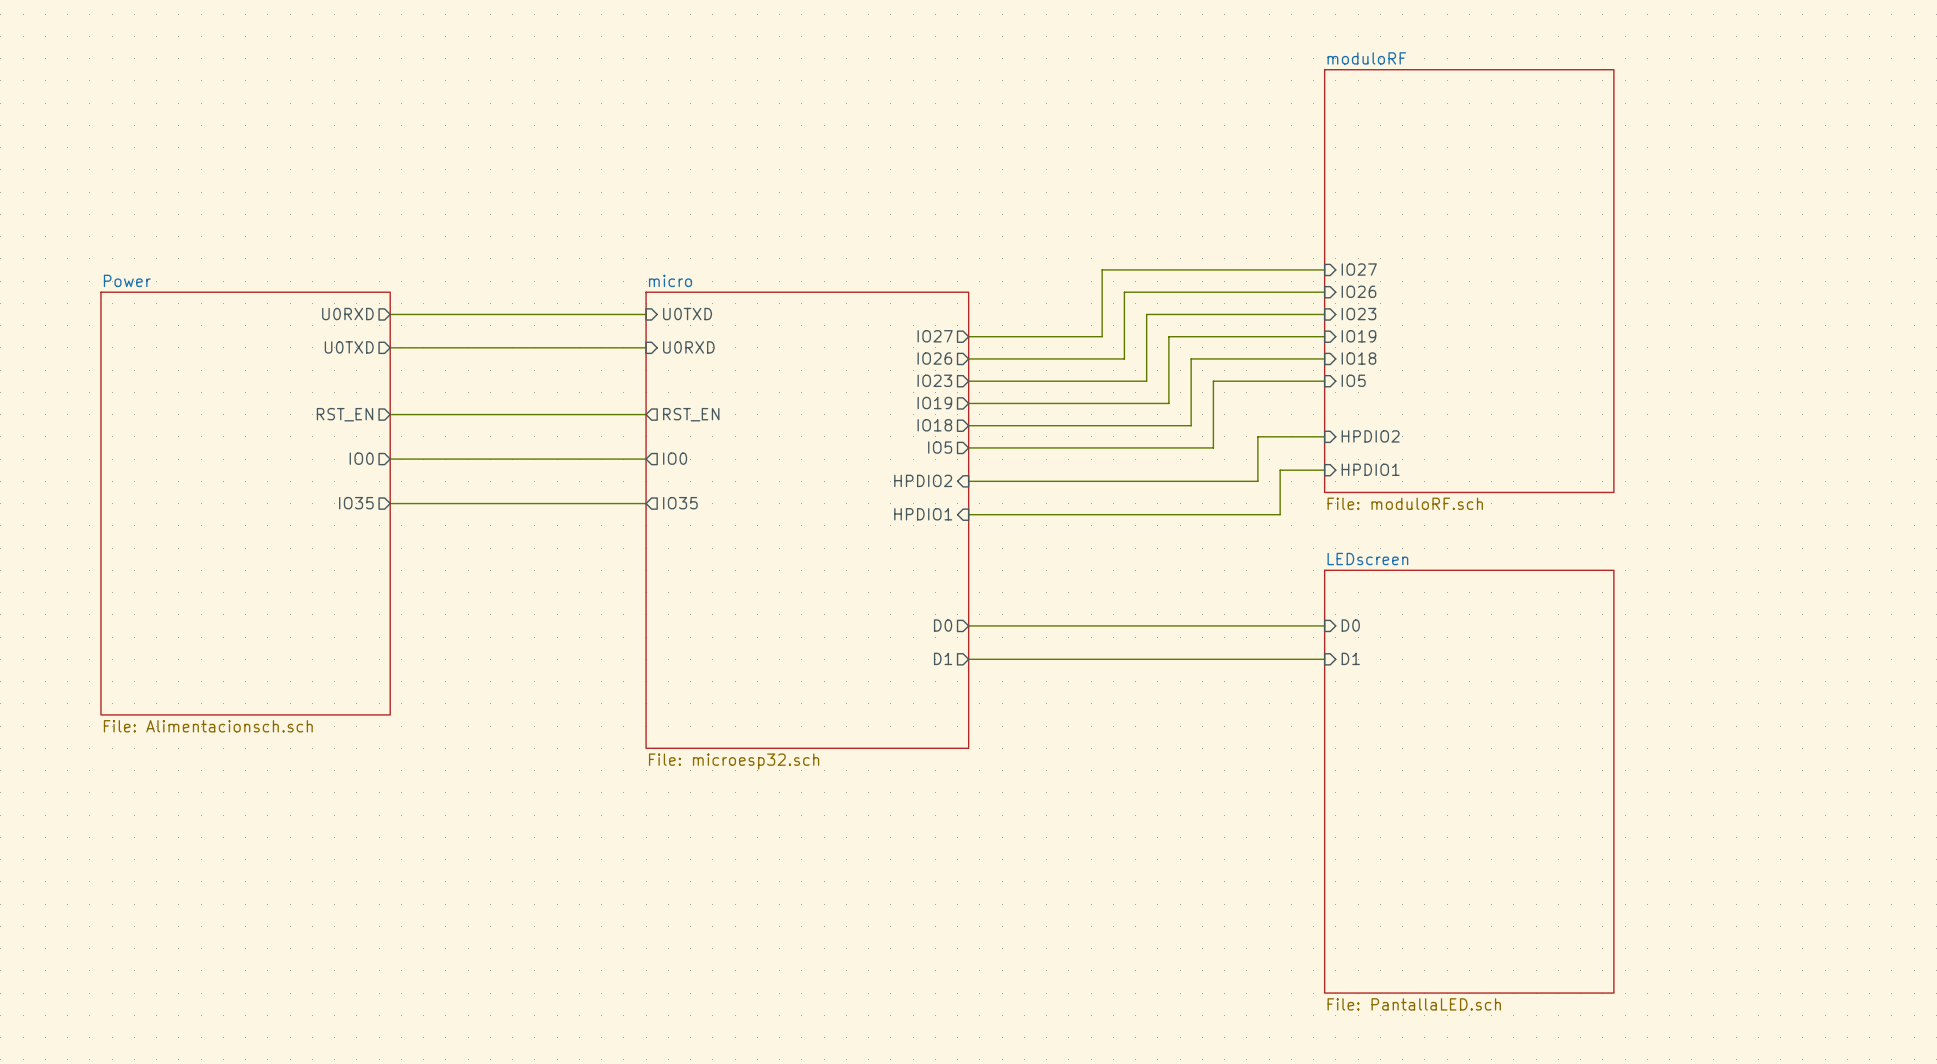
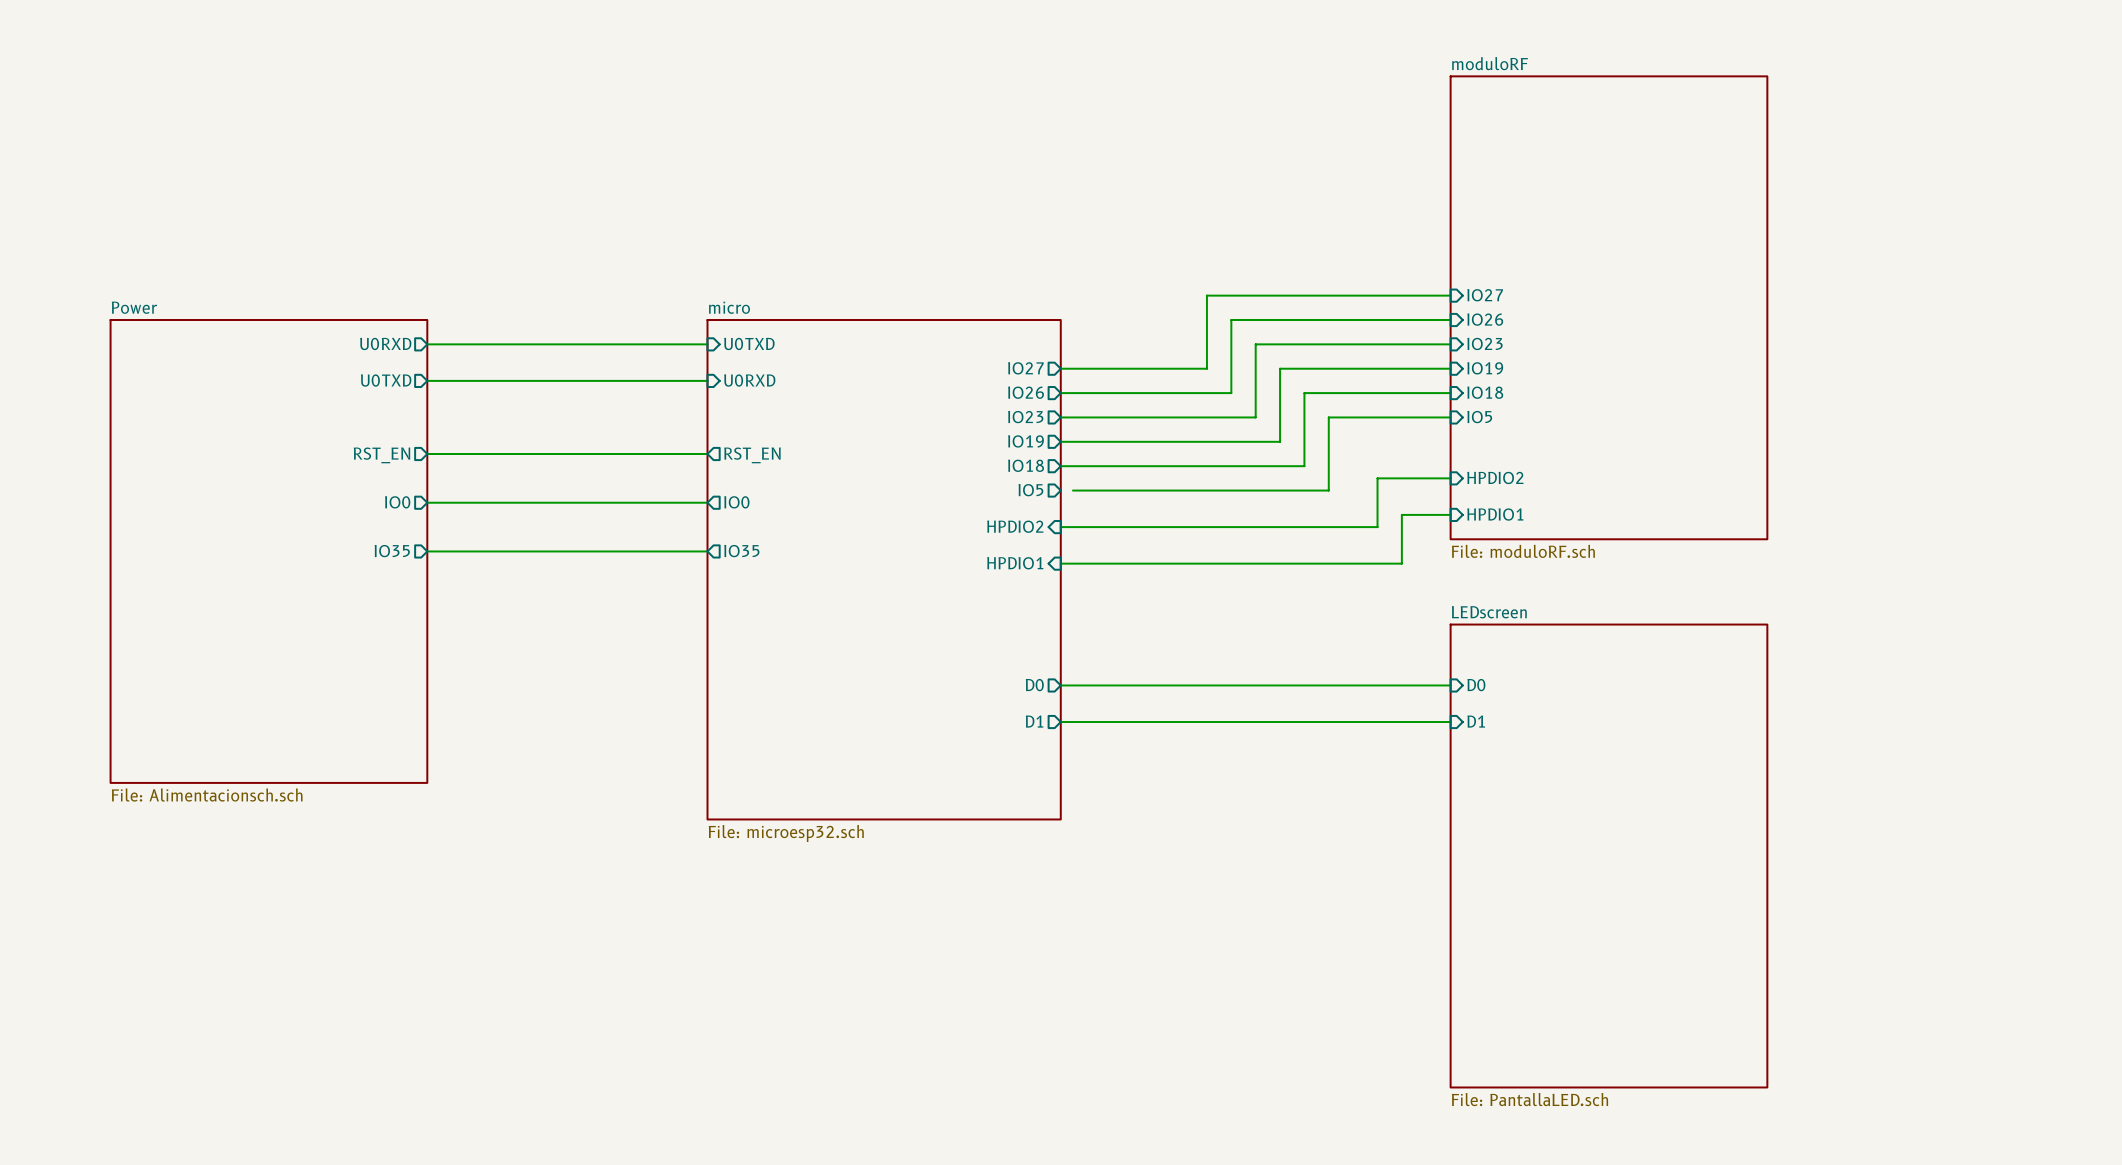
wire: (968, 447) (979, 447) -> none

